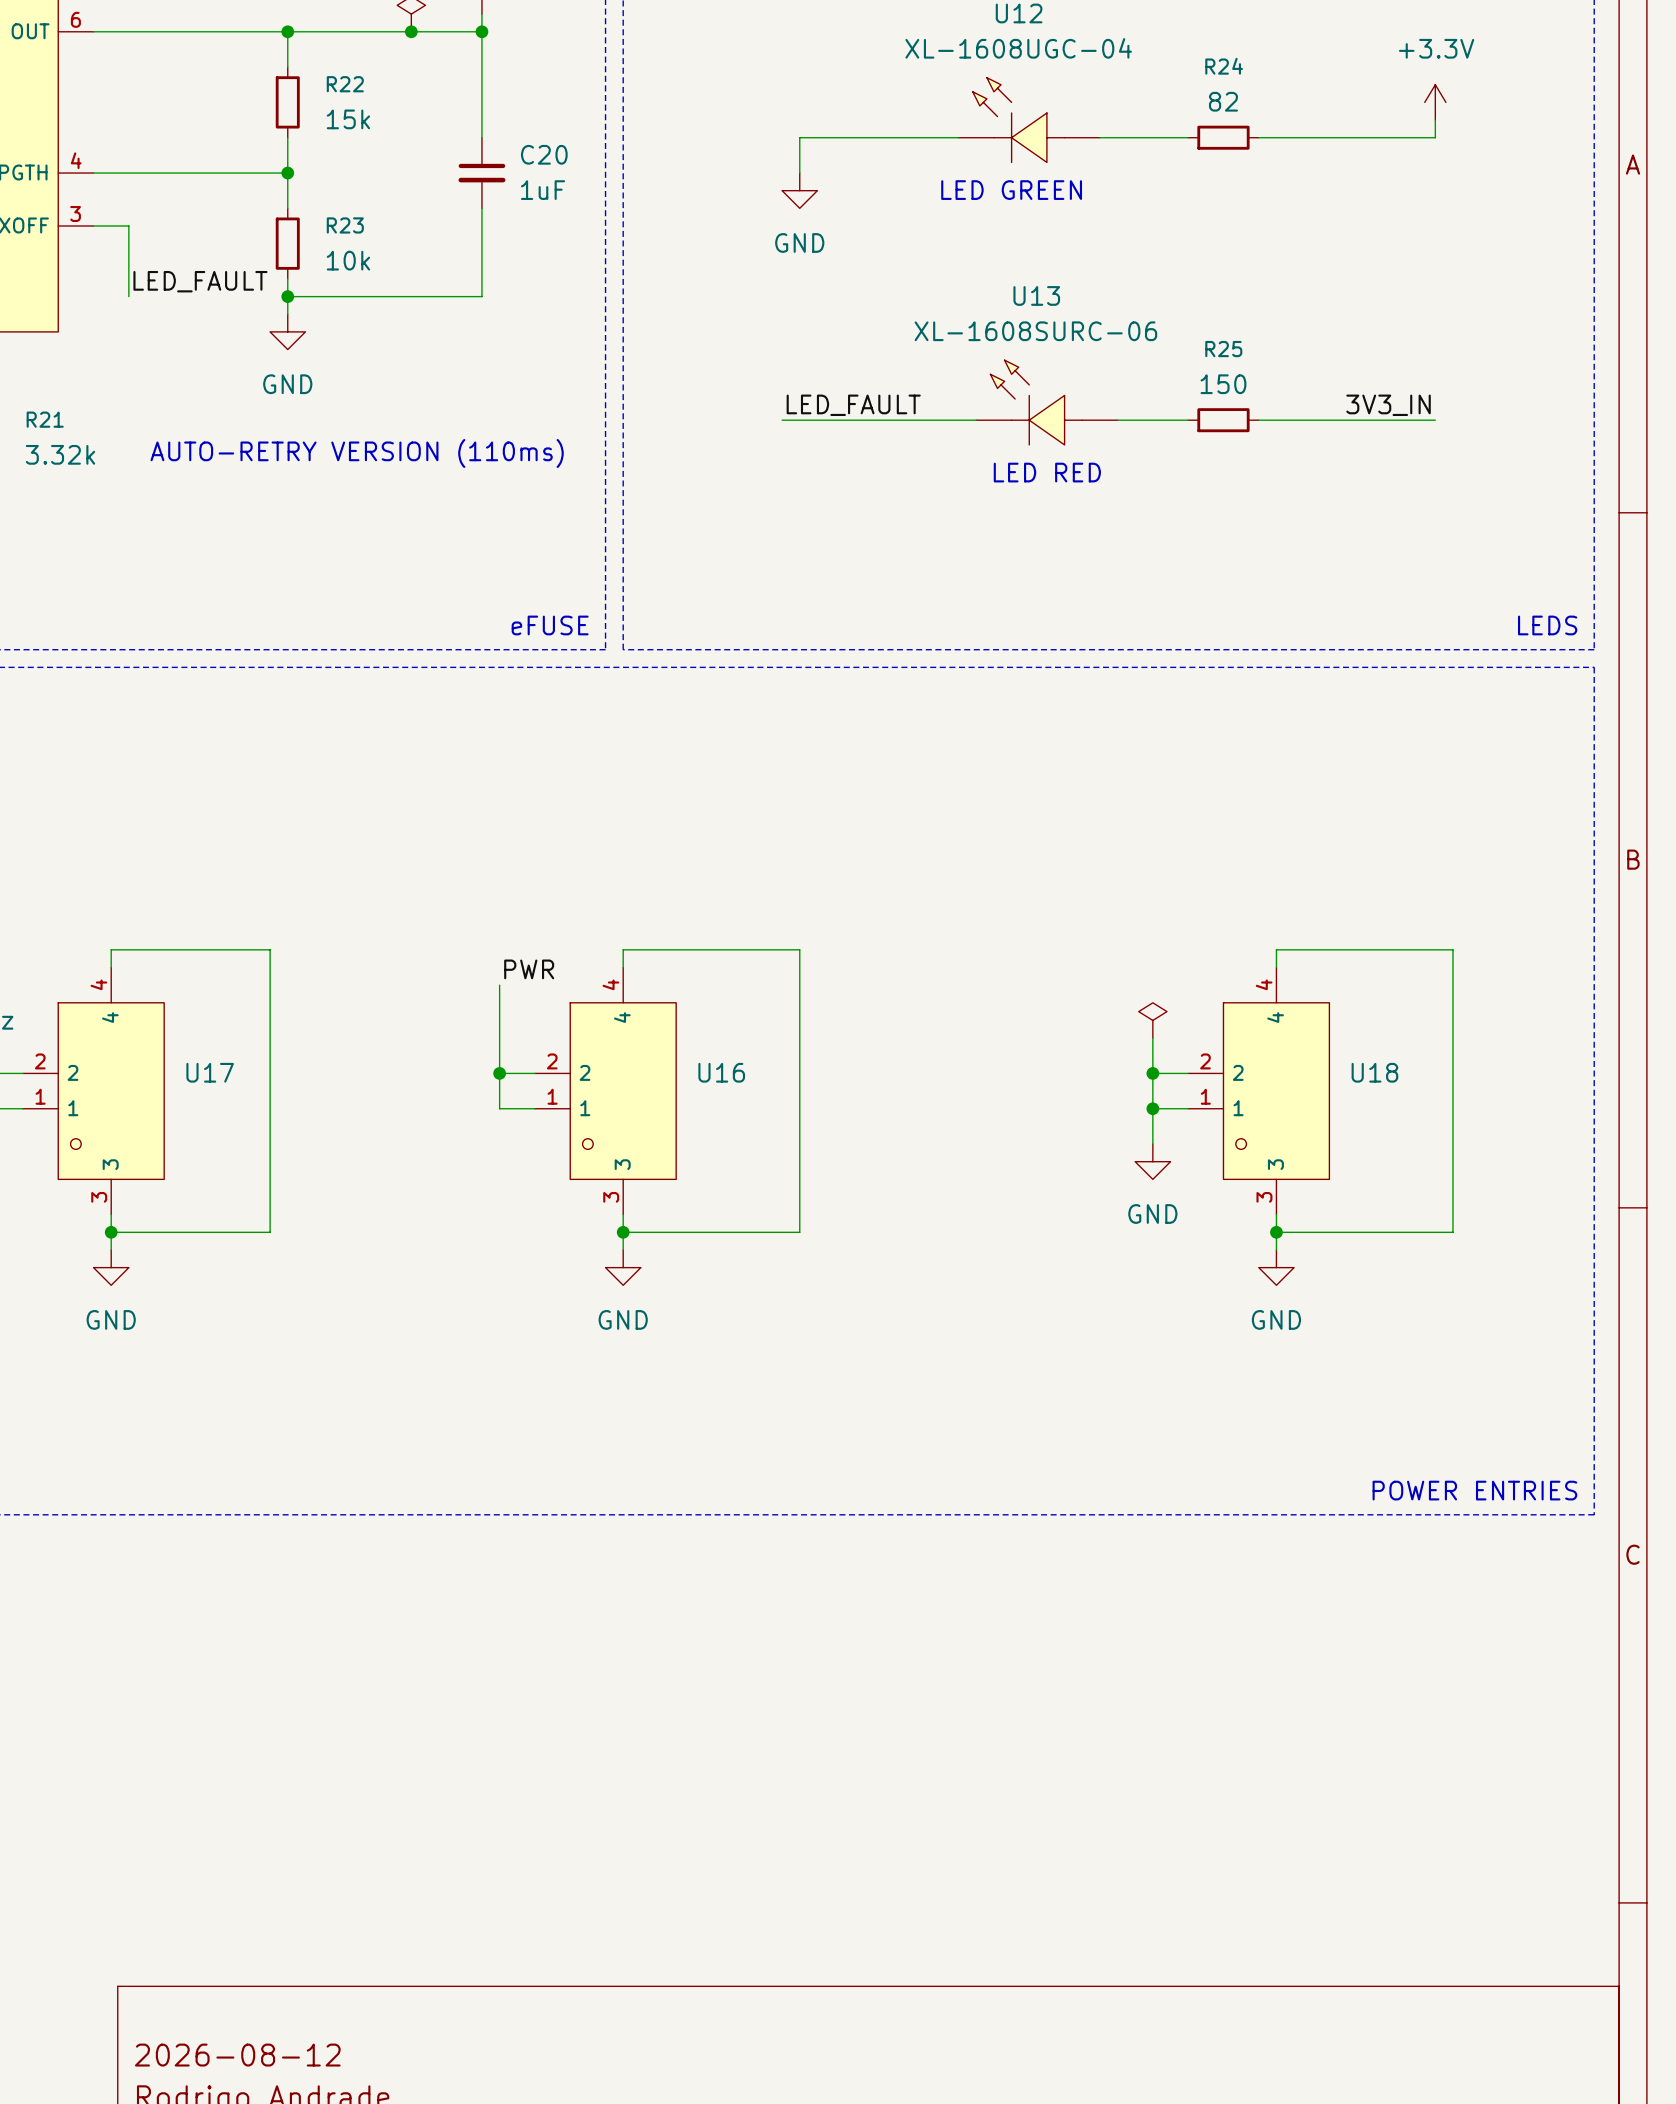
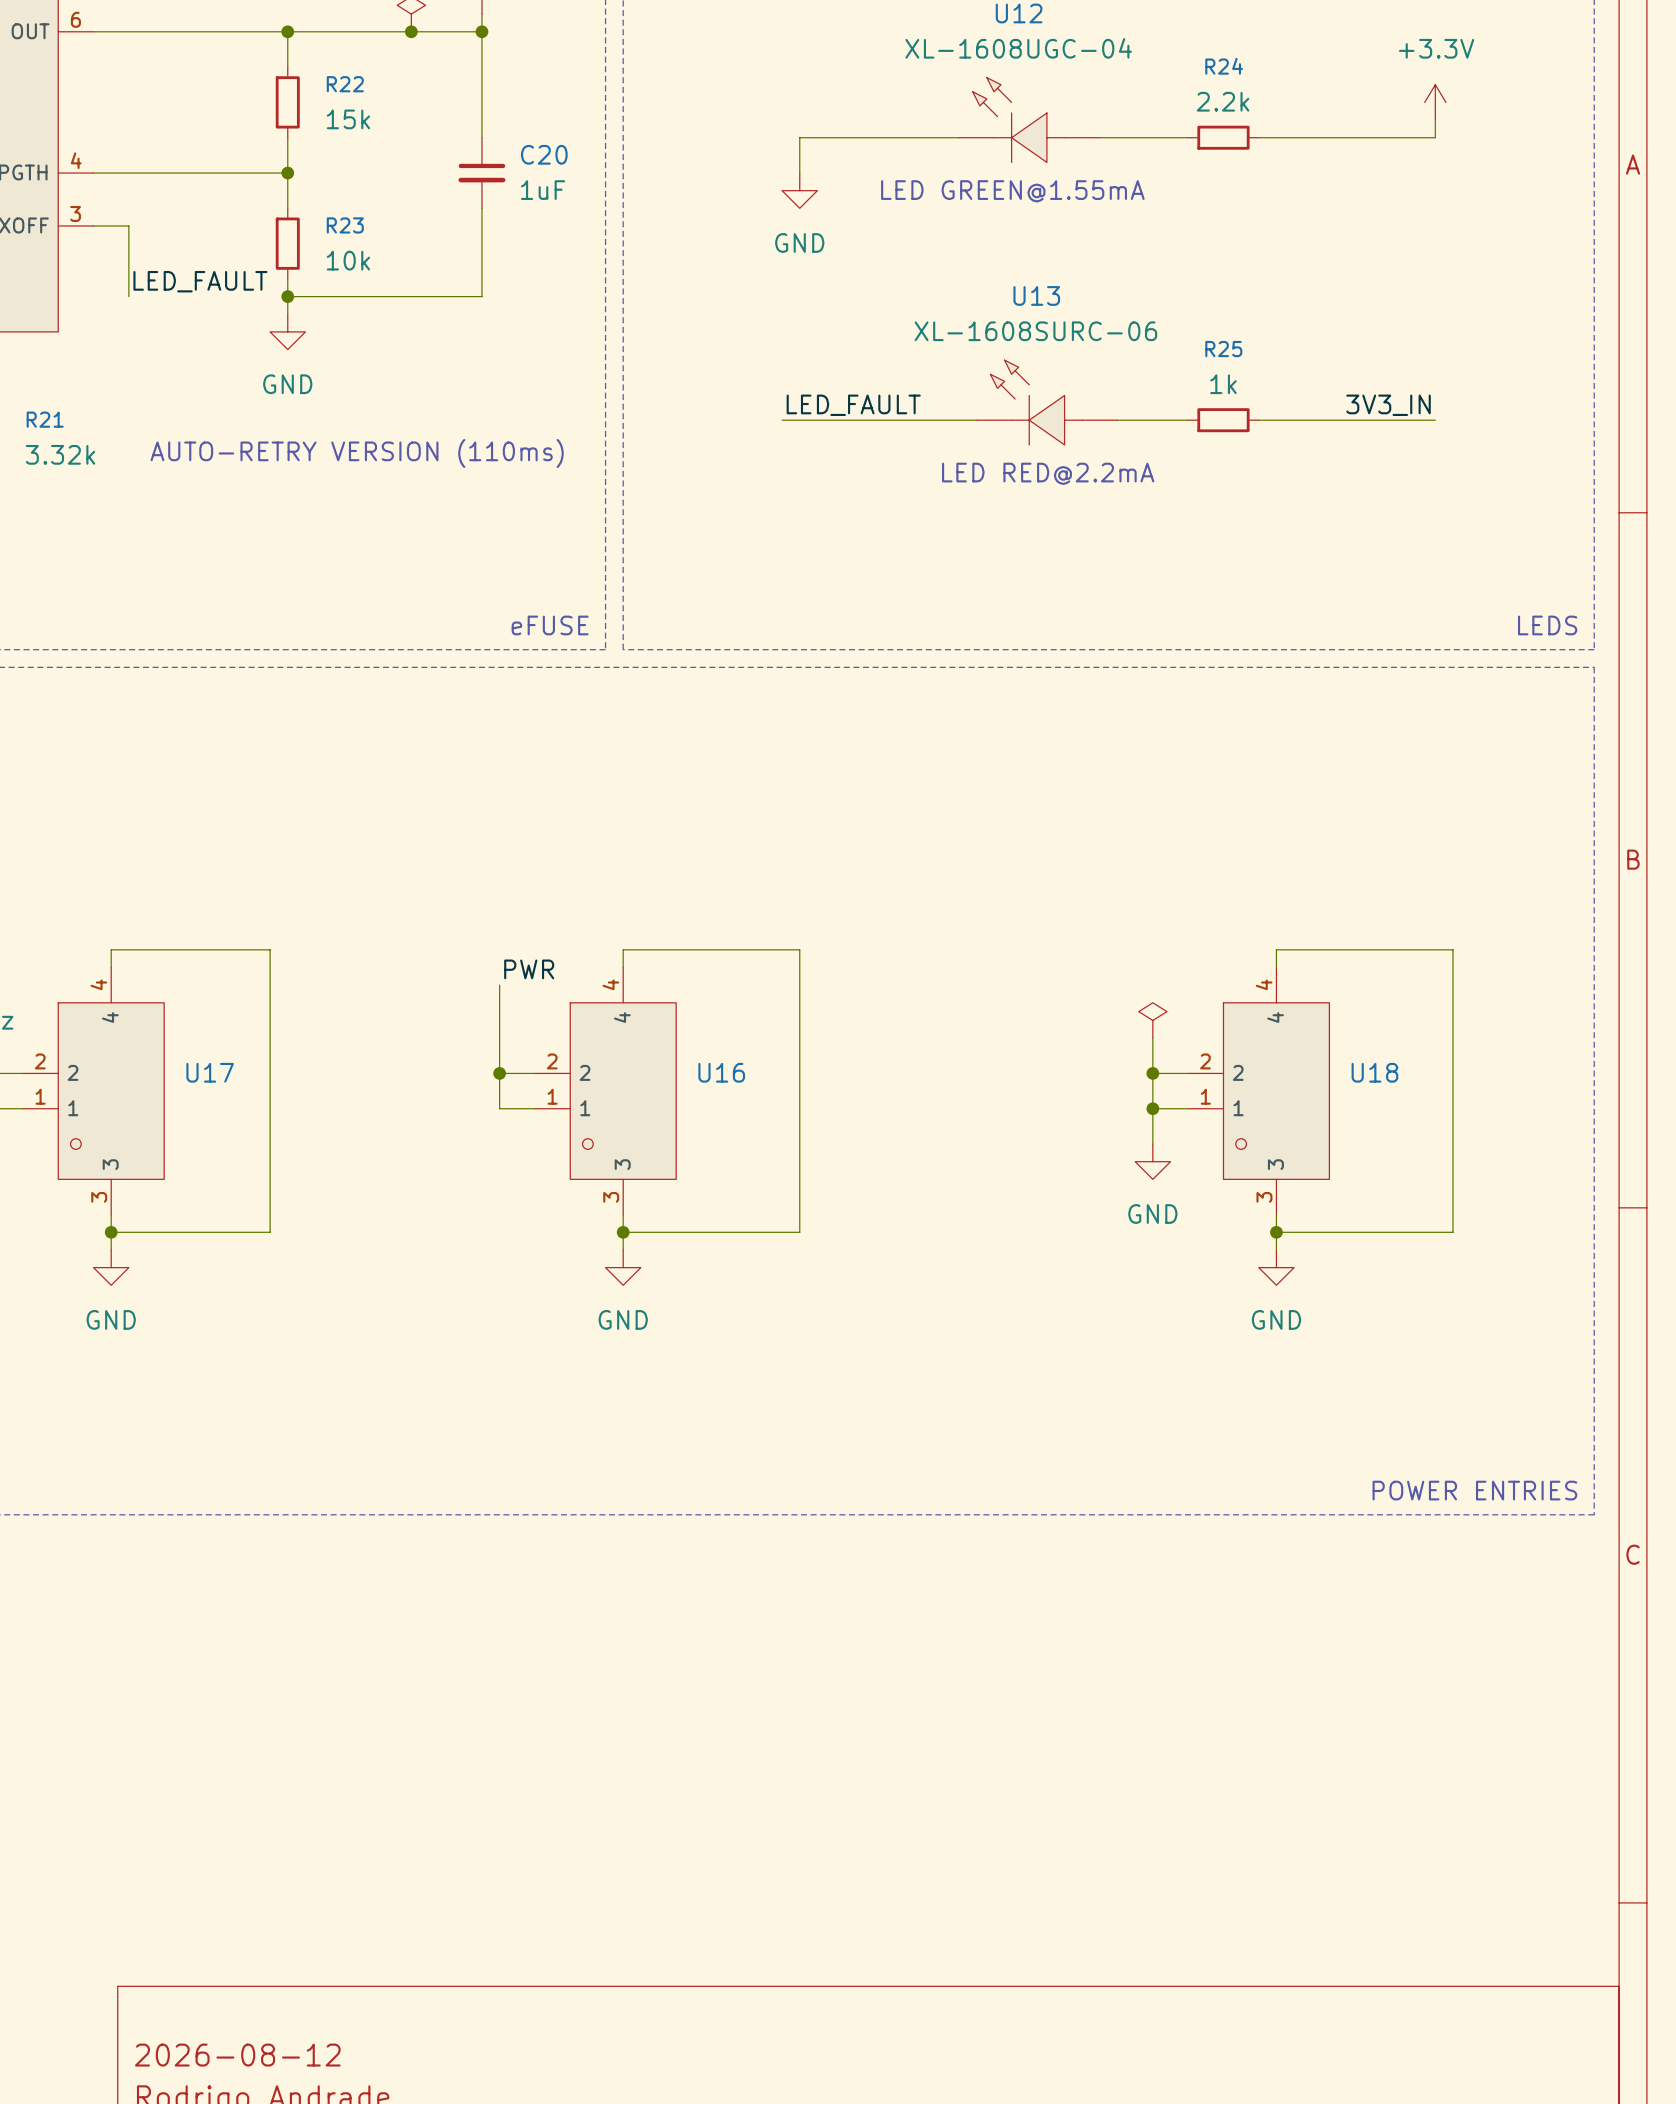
R24 value: 82 (1223, 101) -> 2.2k (1223, 101)
text: LED GREEN (1011, 190) -> LED GREEN@1.55mA (1012, 191)
R25 value: 150 (1223, 384) -> 1k (1223, 384)
text: LED RED (1047, 472) -> LED RED@2.2mA (1048, 473)

